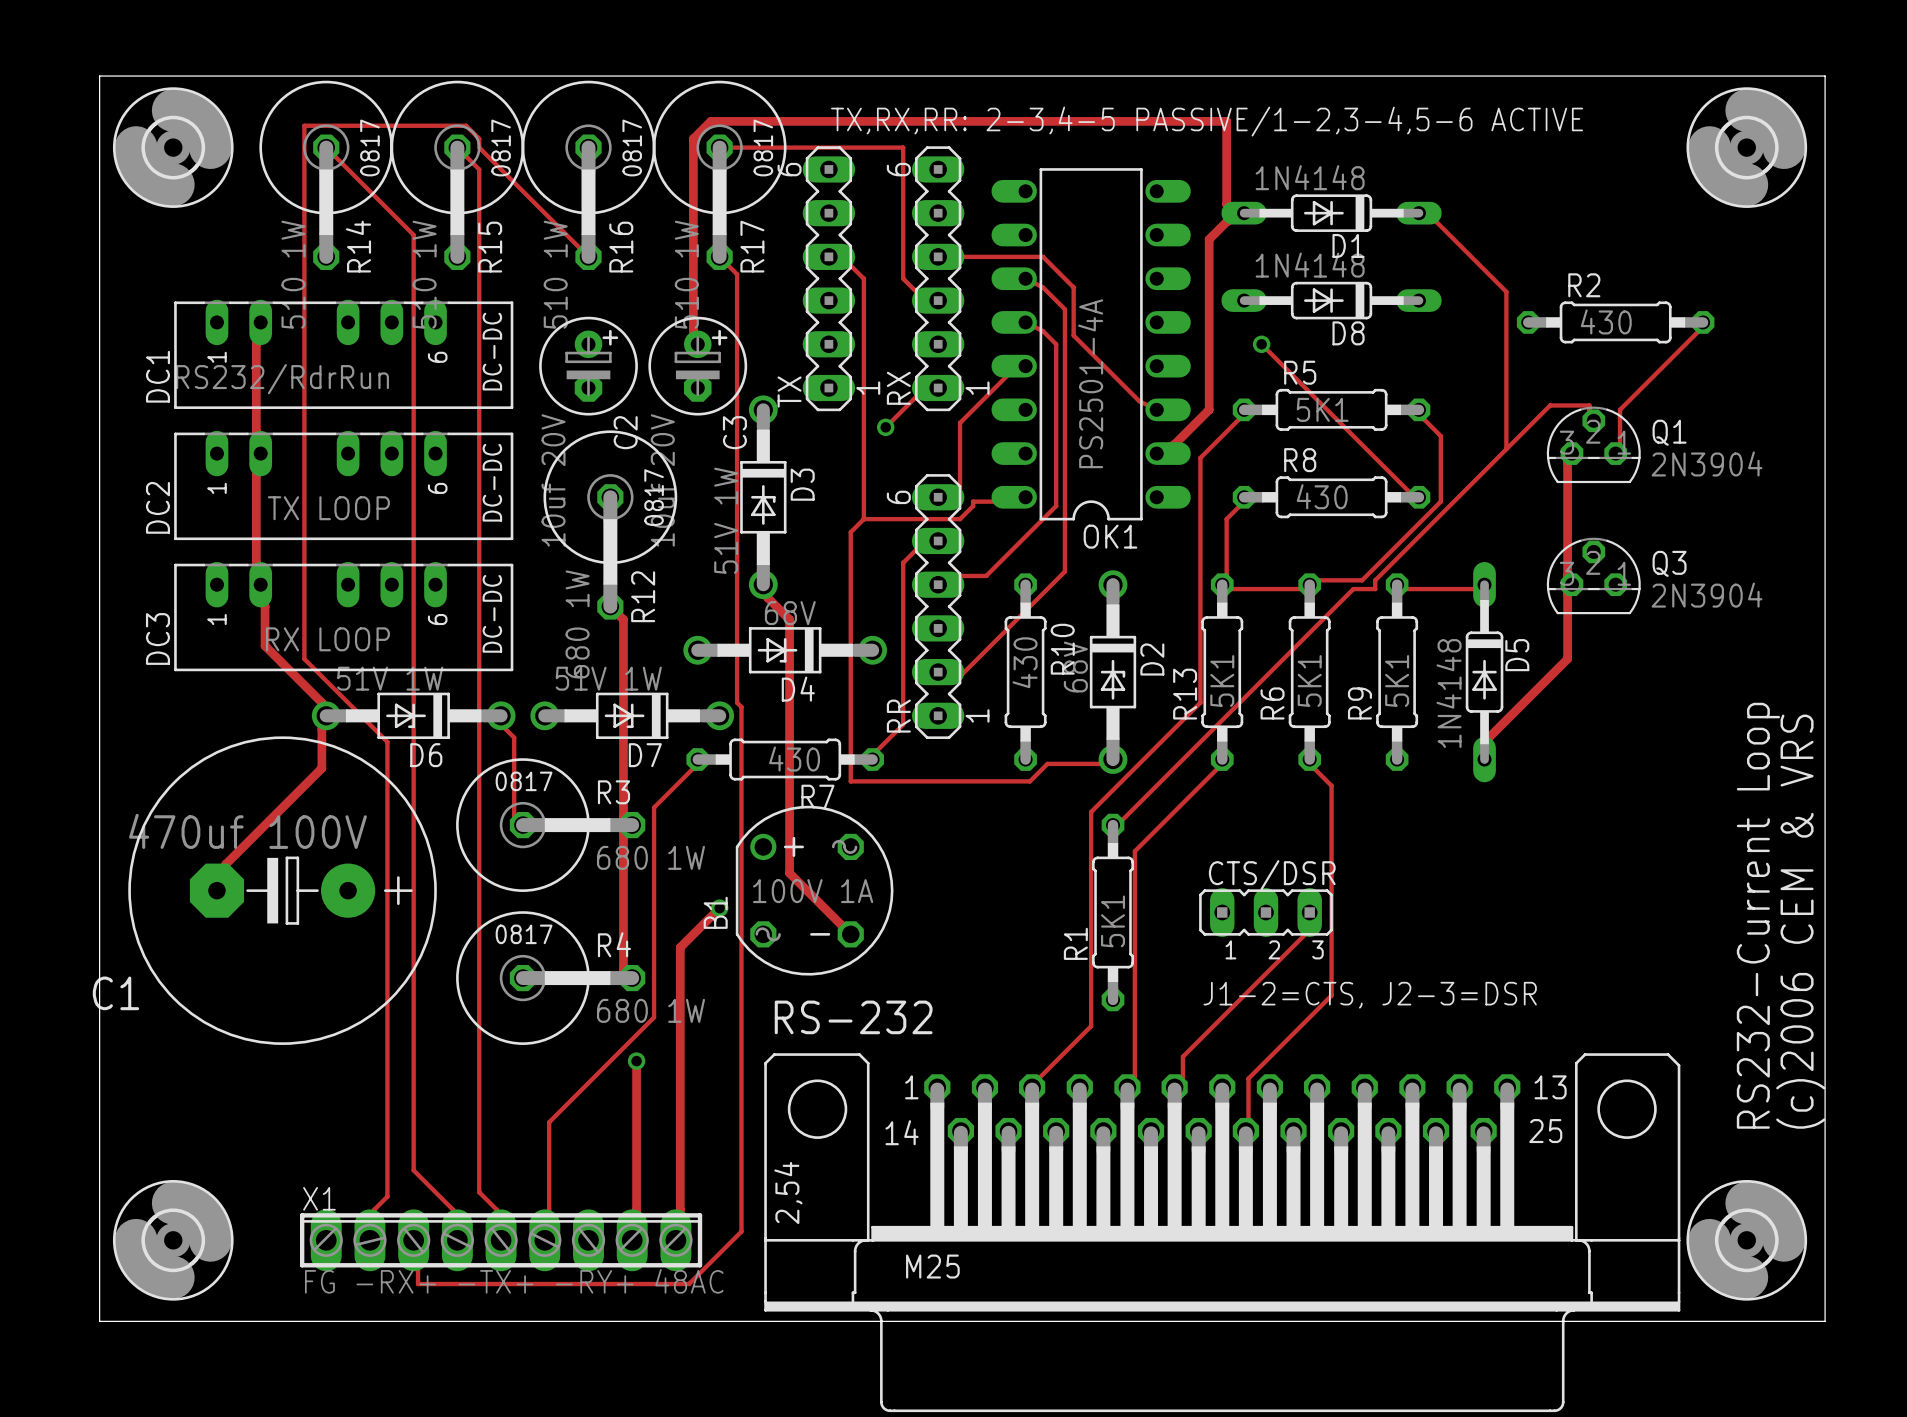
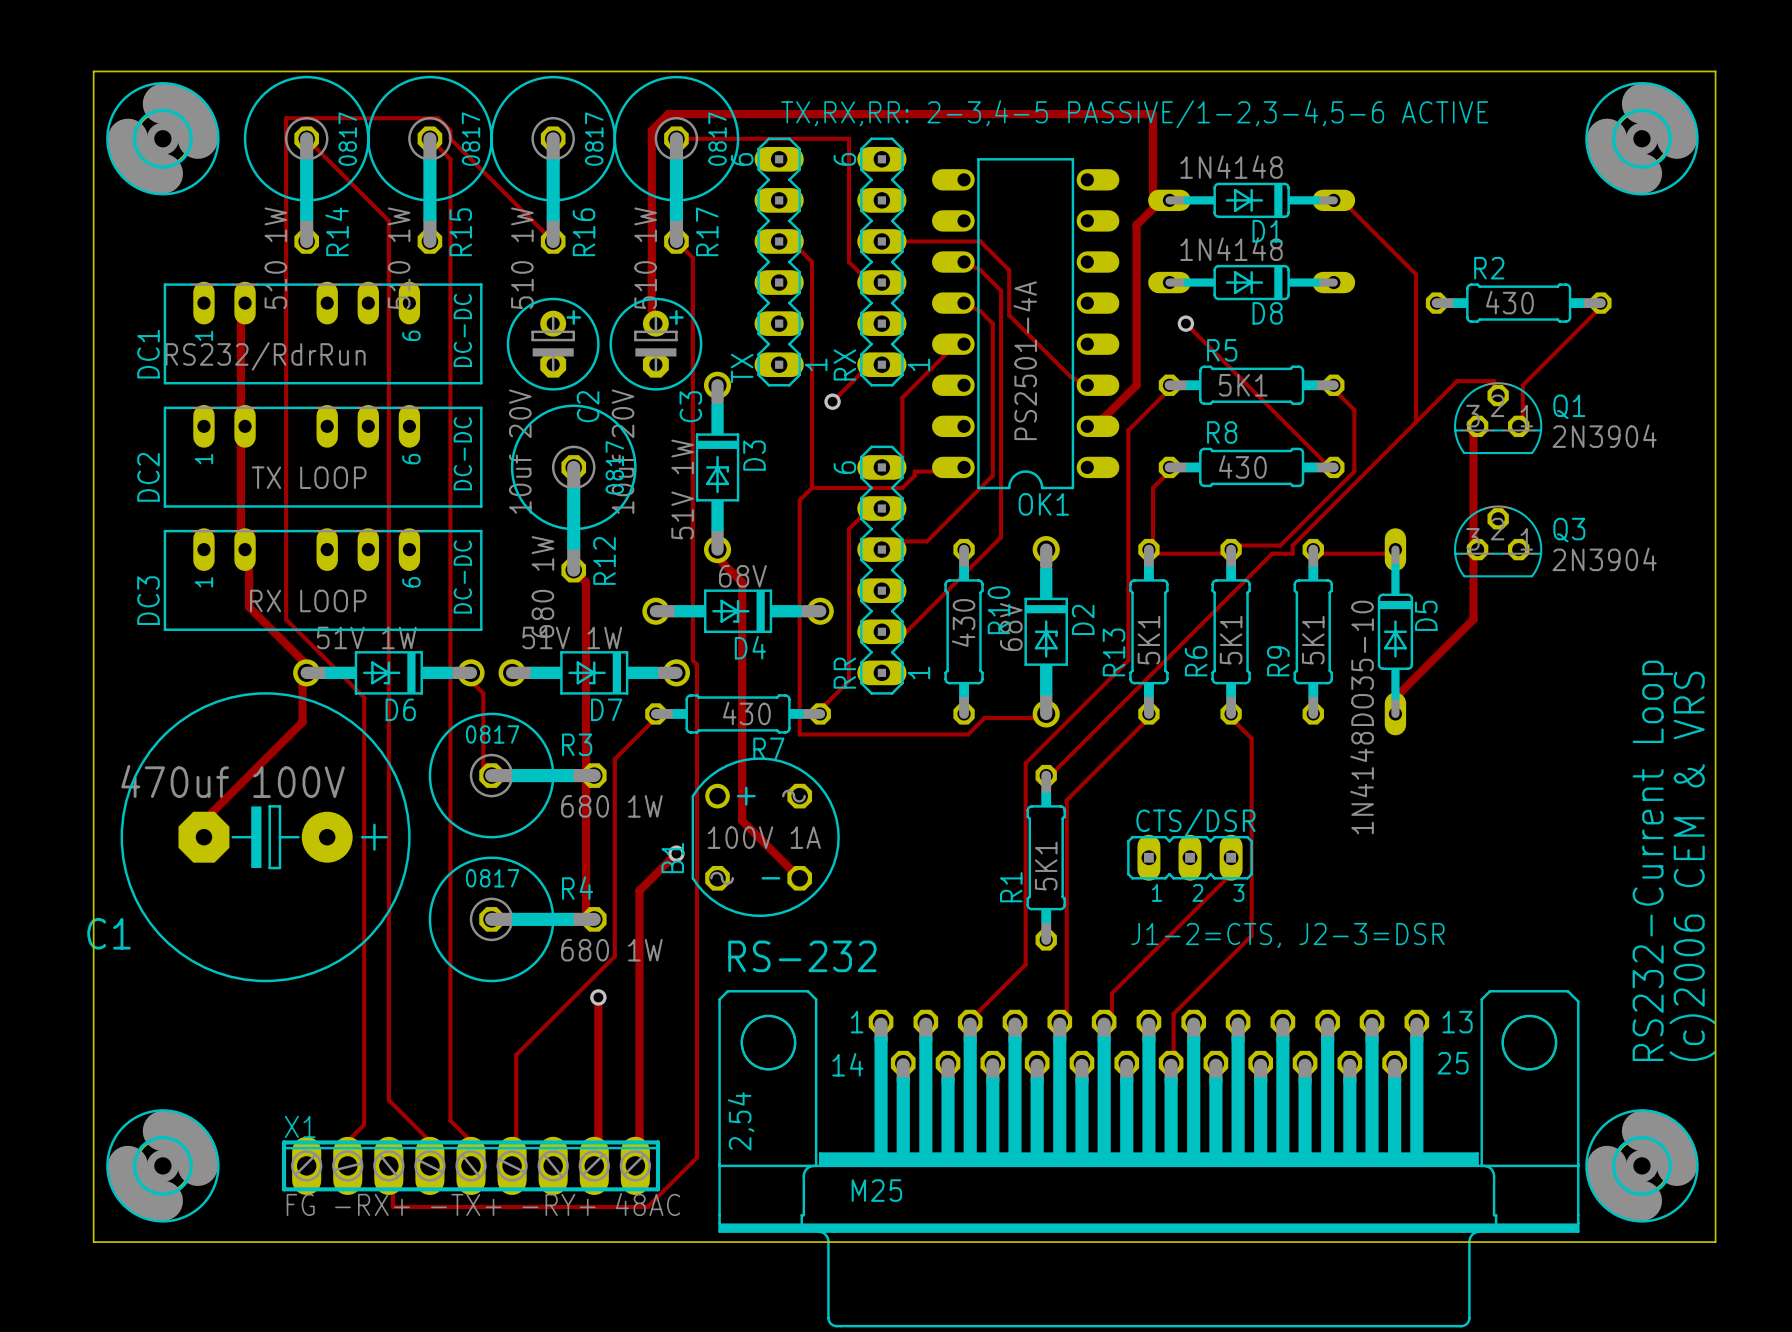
D5 value: 1N4148 (1449, 693) -> 1N4148DO35-10 (1362, 717)

